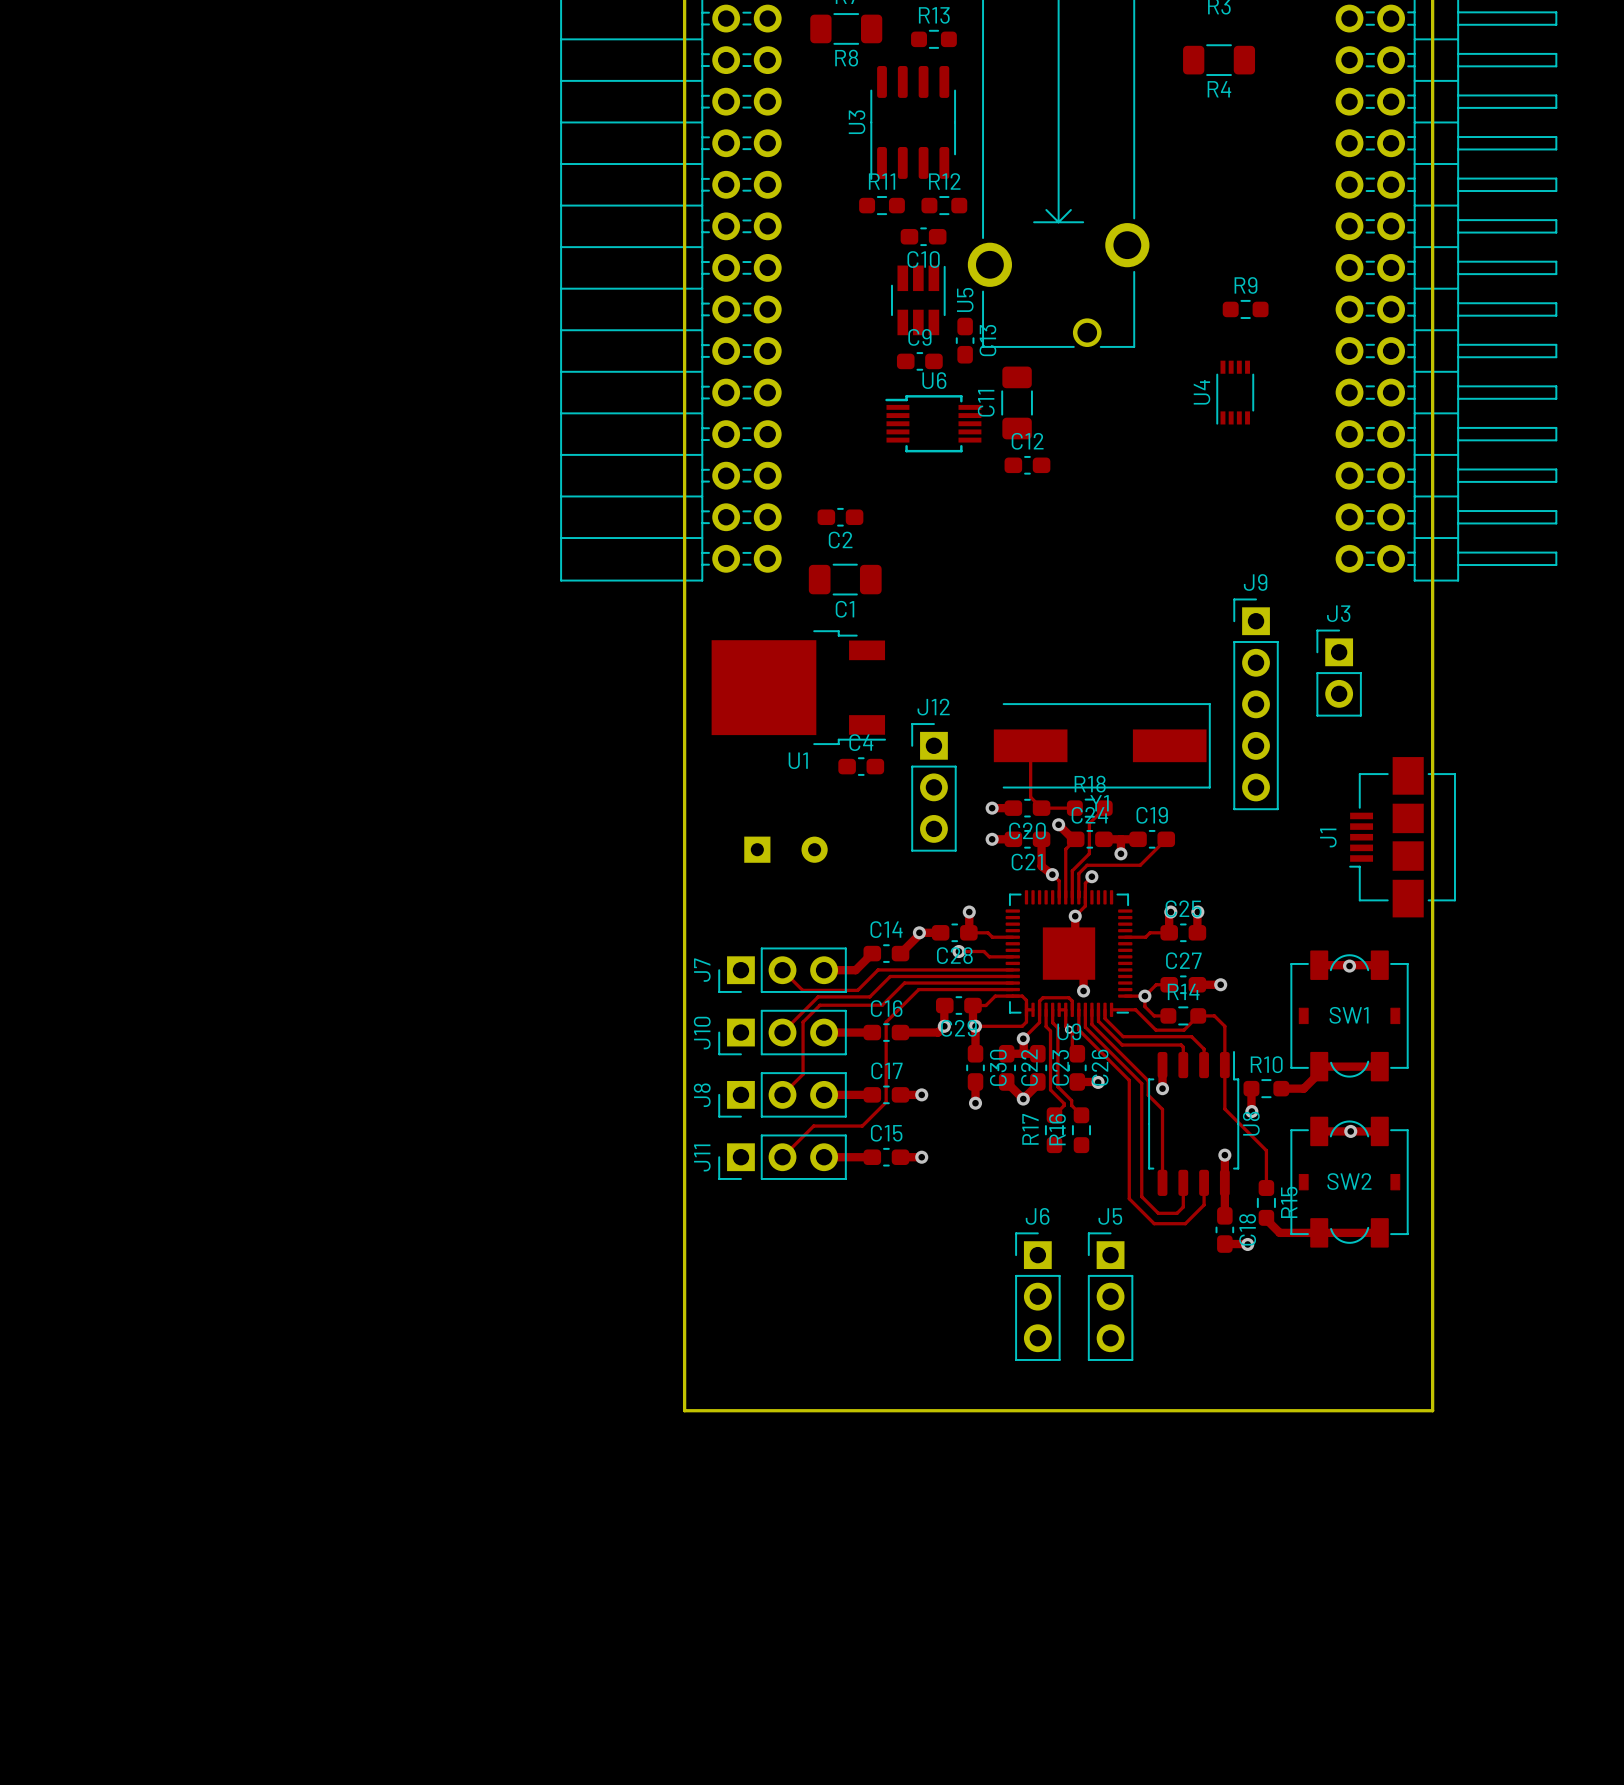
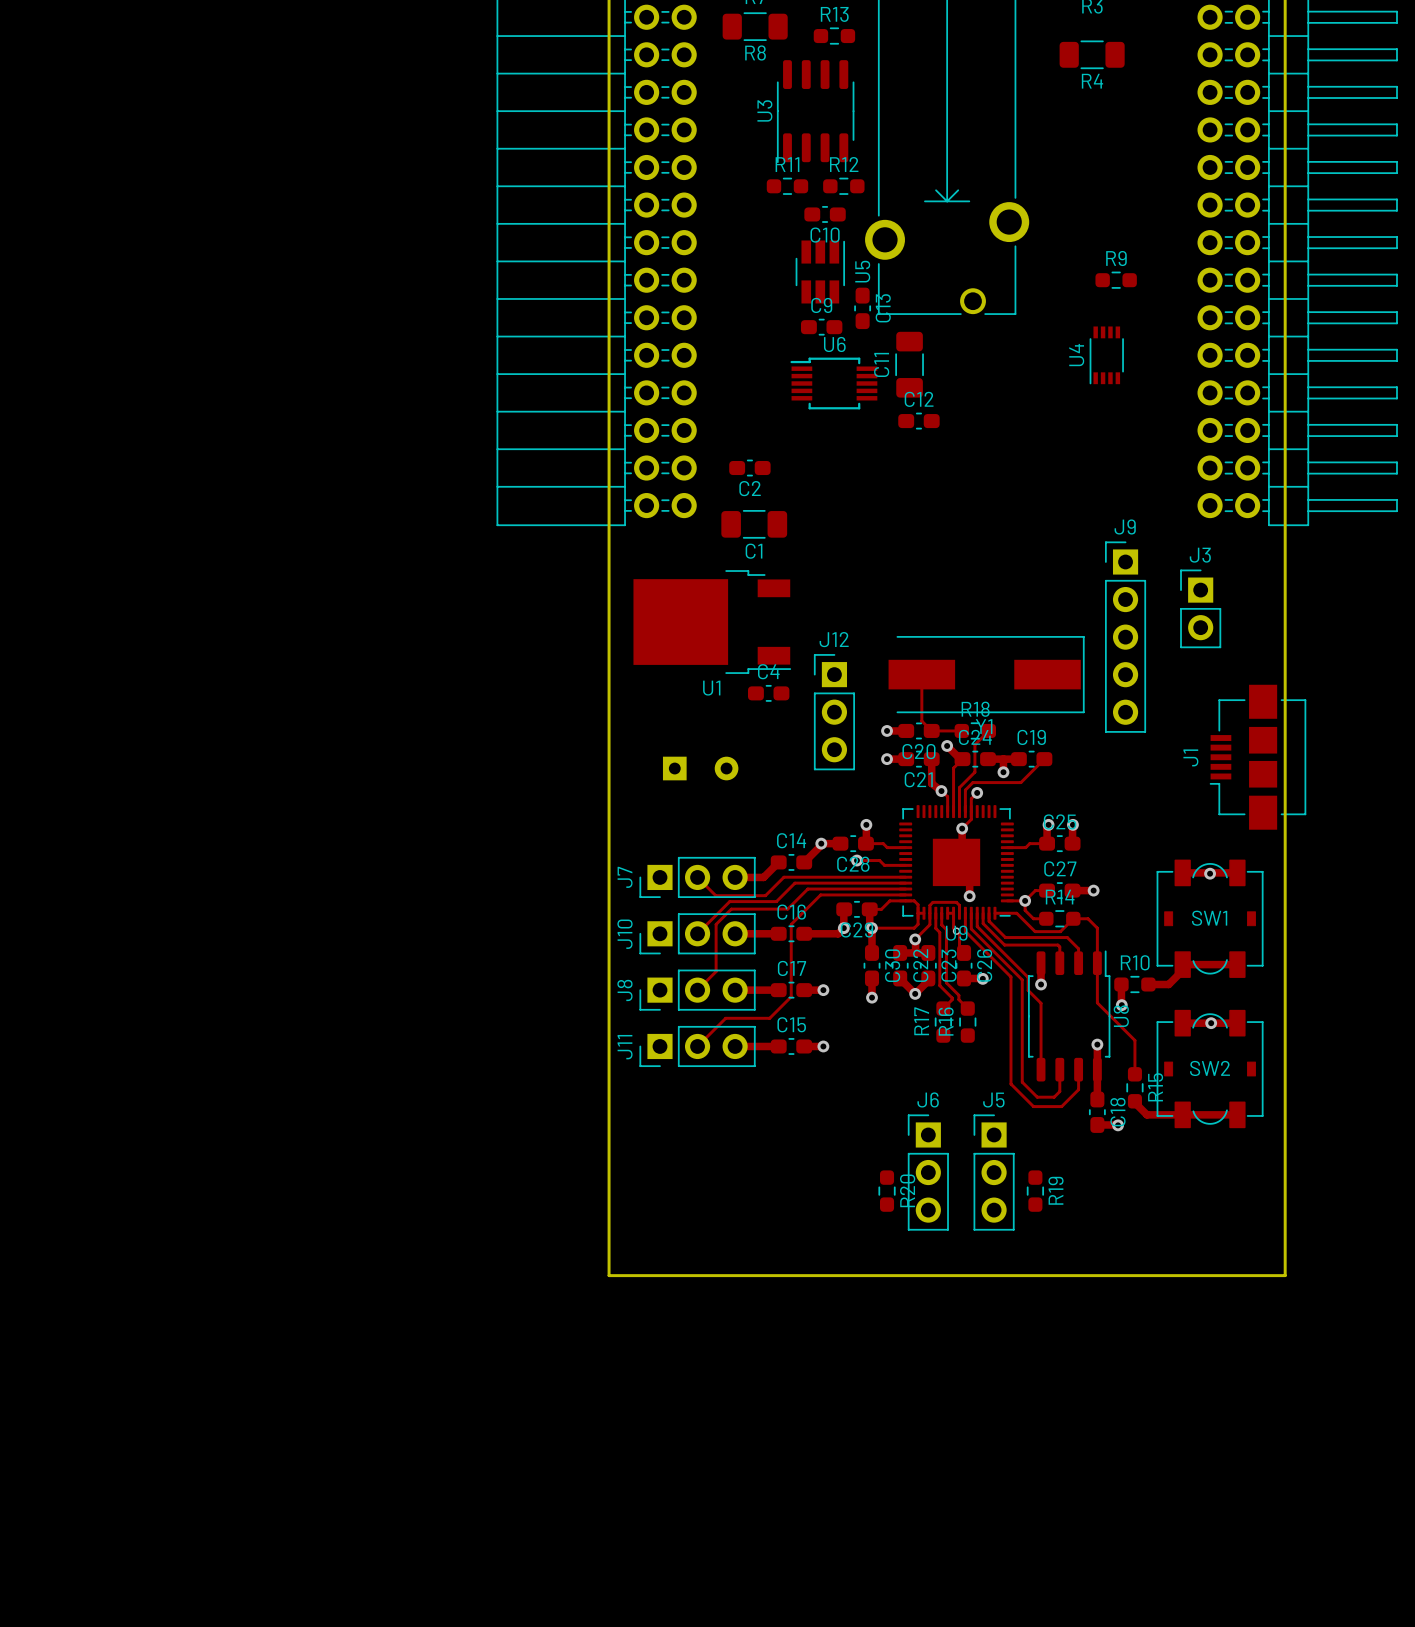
R20: none -> (887, 1191)
R19: none -> (1035, 1191)

